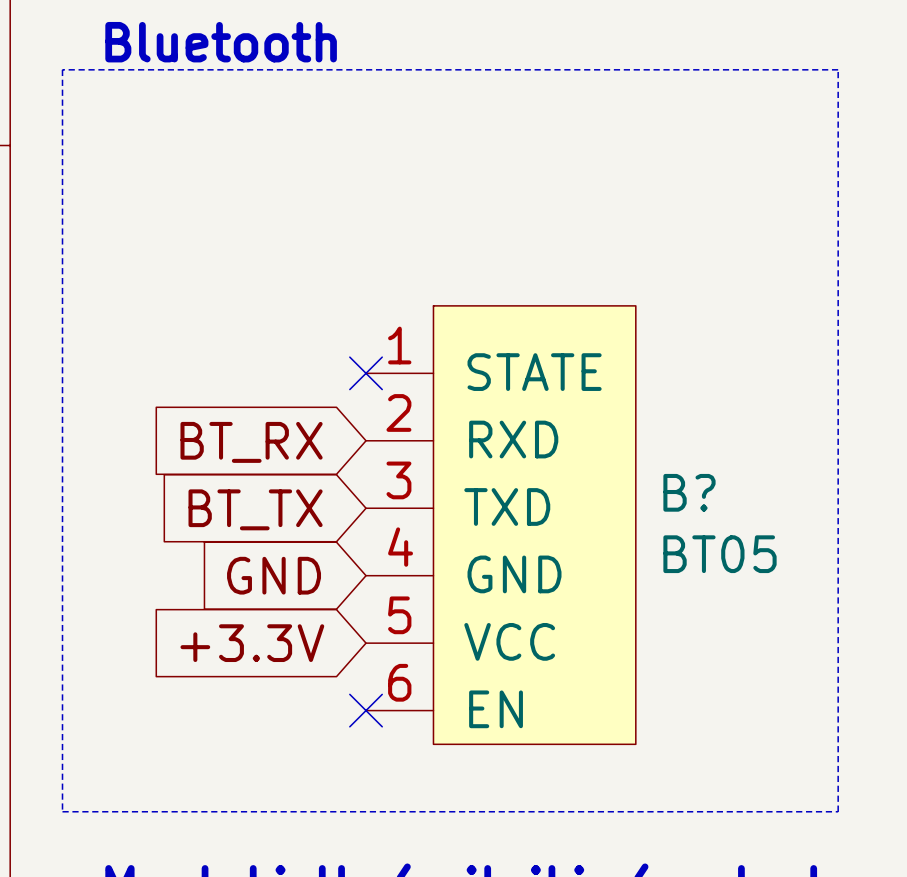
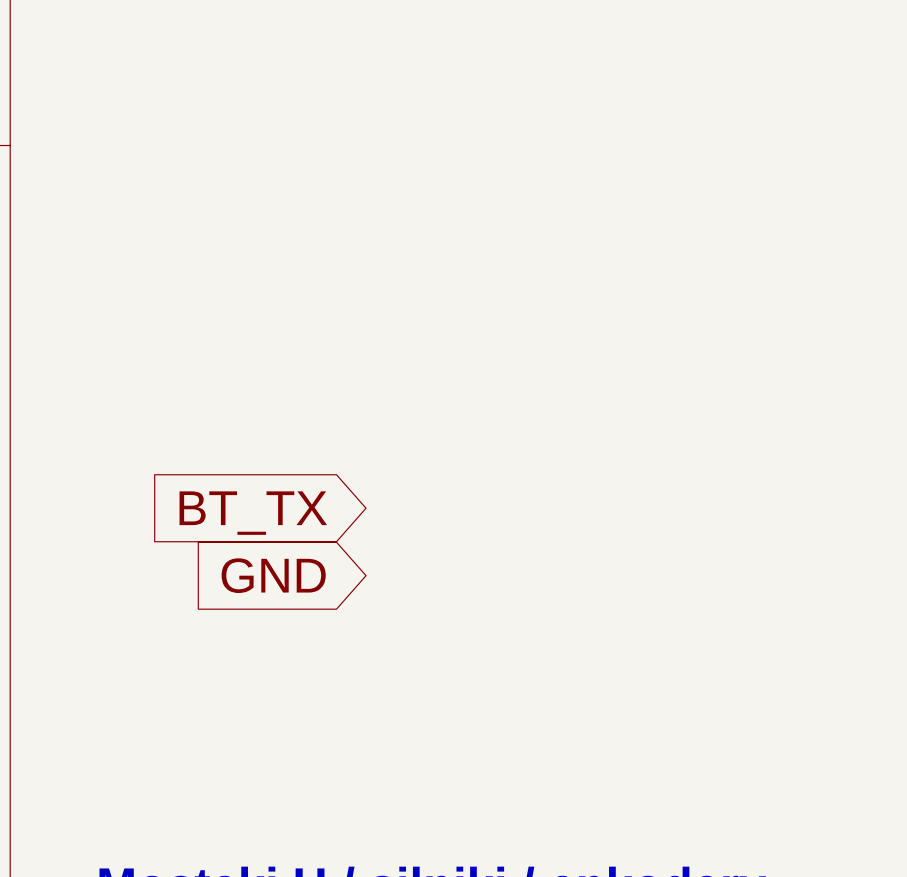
text: Bluetooth (221, 42) -> none
line: (62, 69) (62, 811) (838, 811) (838, 69) (62, 69) -> none
no-connect mark: (366, 373) -> none
global label: BT_RX (251, 442) -> none
B?: BT05 (500, 525) -> none
global label: +3.3V (252, 643) -> none
no-connect mark: (366, 710) -> none

